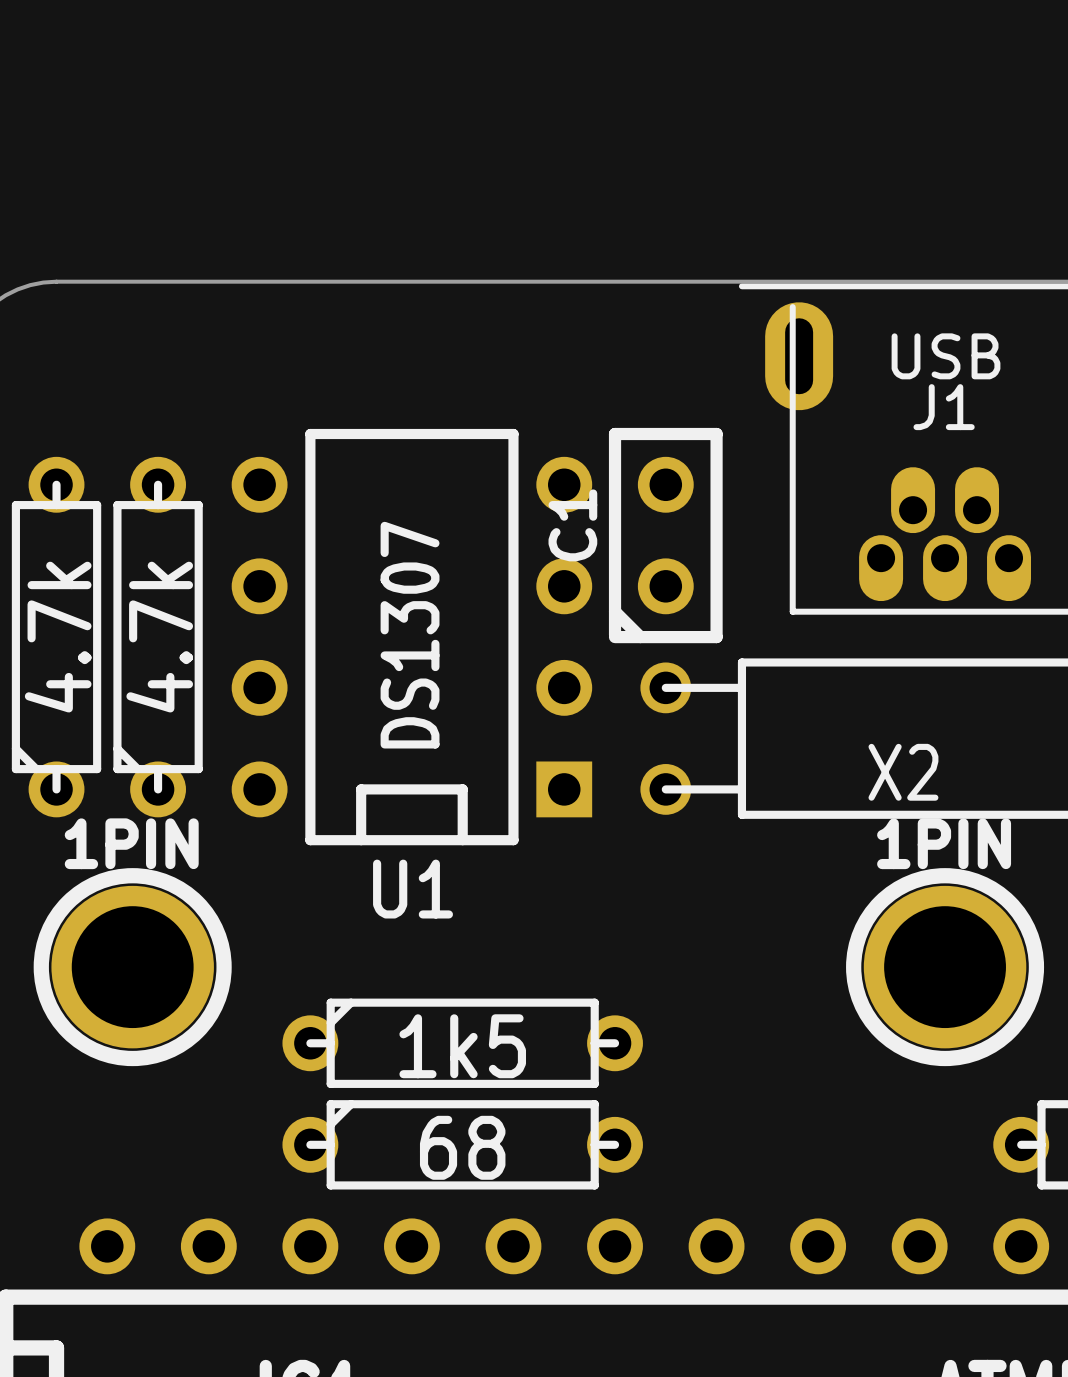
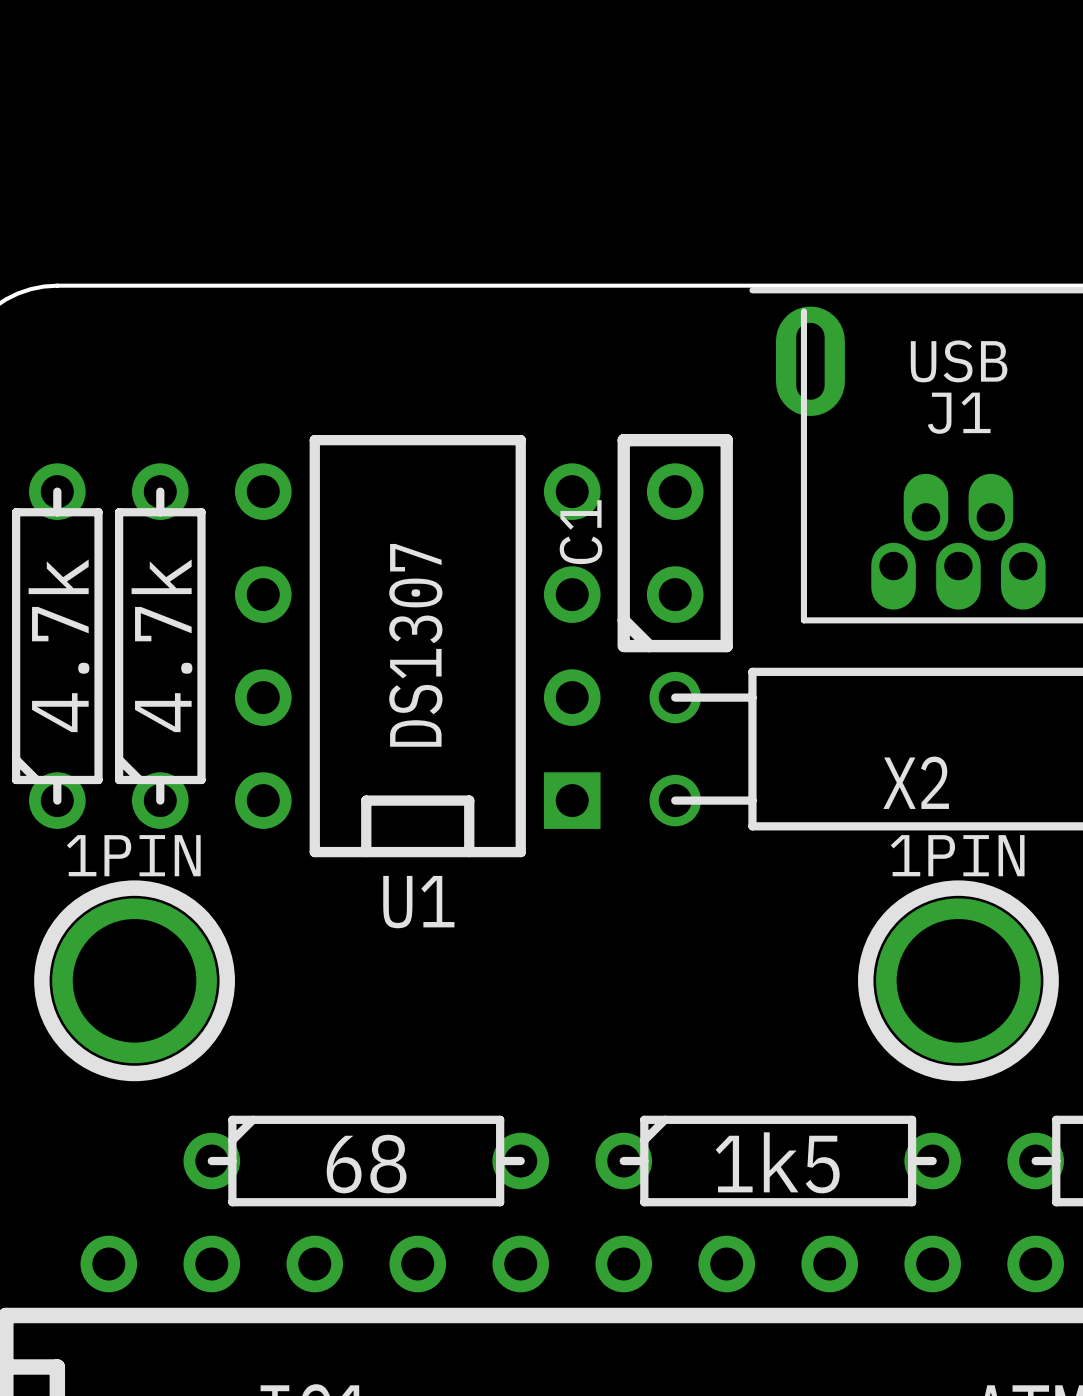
part position: (462, 1043) -> (778, 1161)
part position: (462, 1144) -> (366, 1161)

